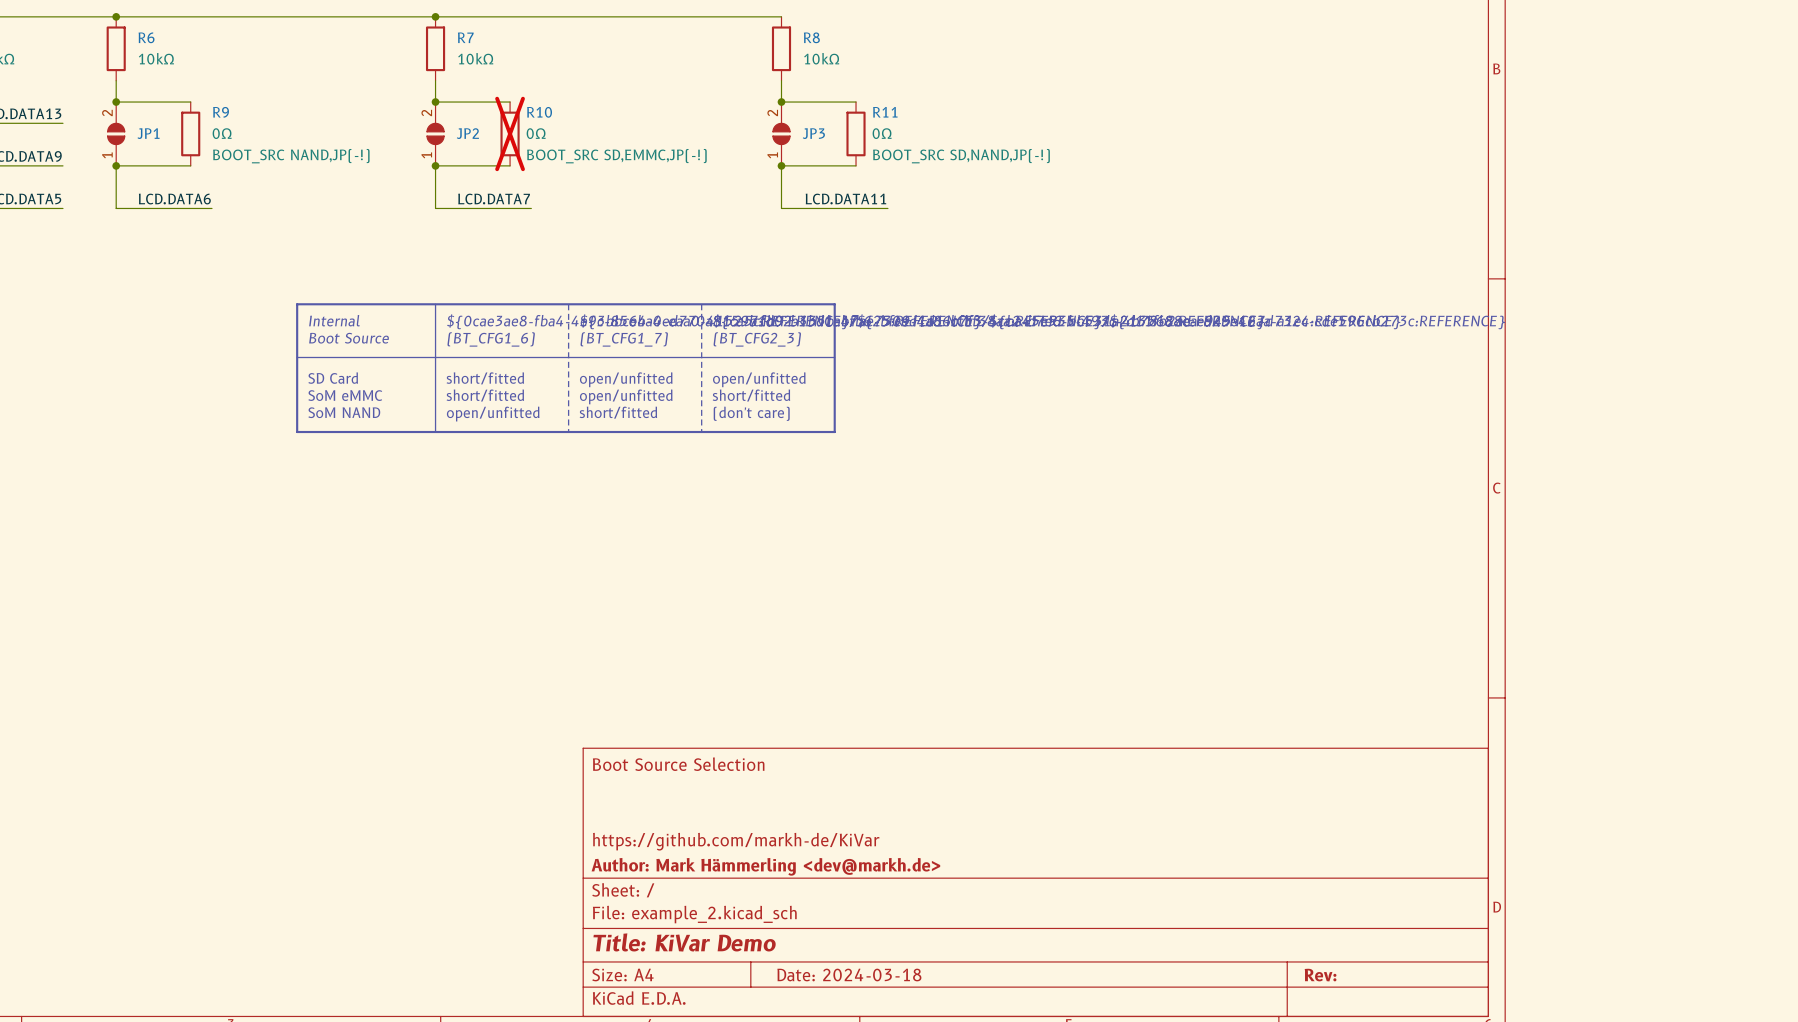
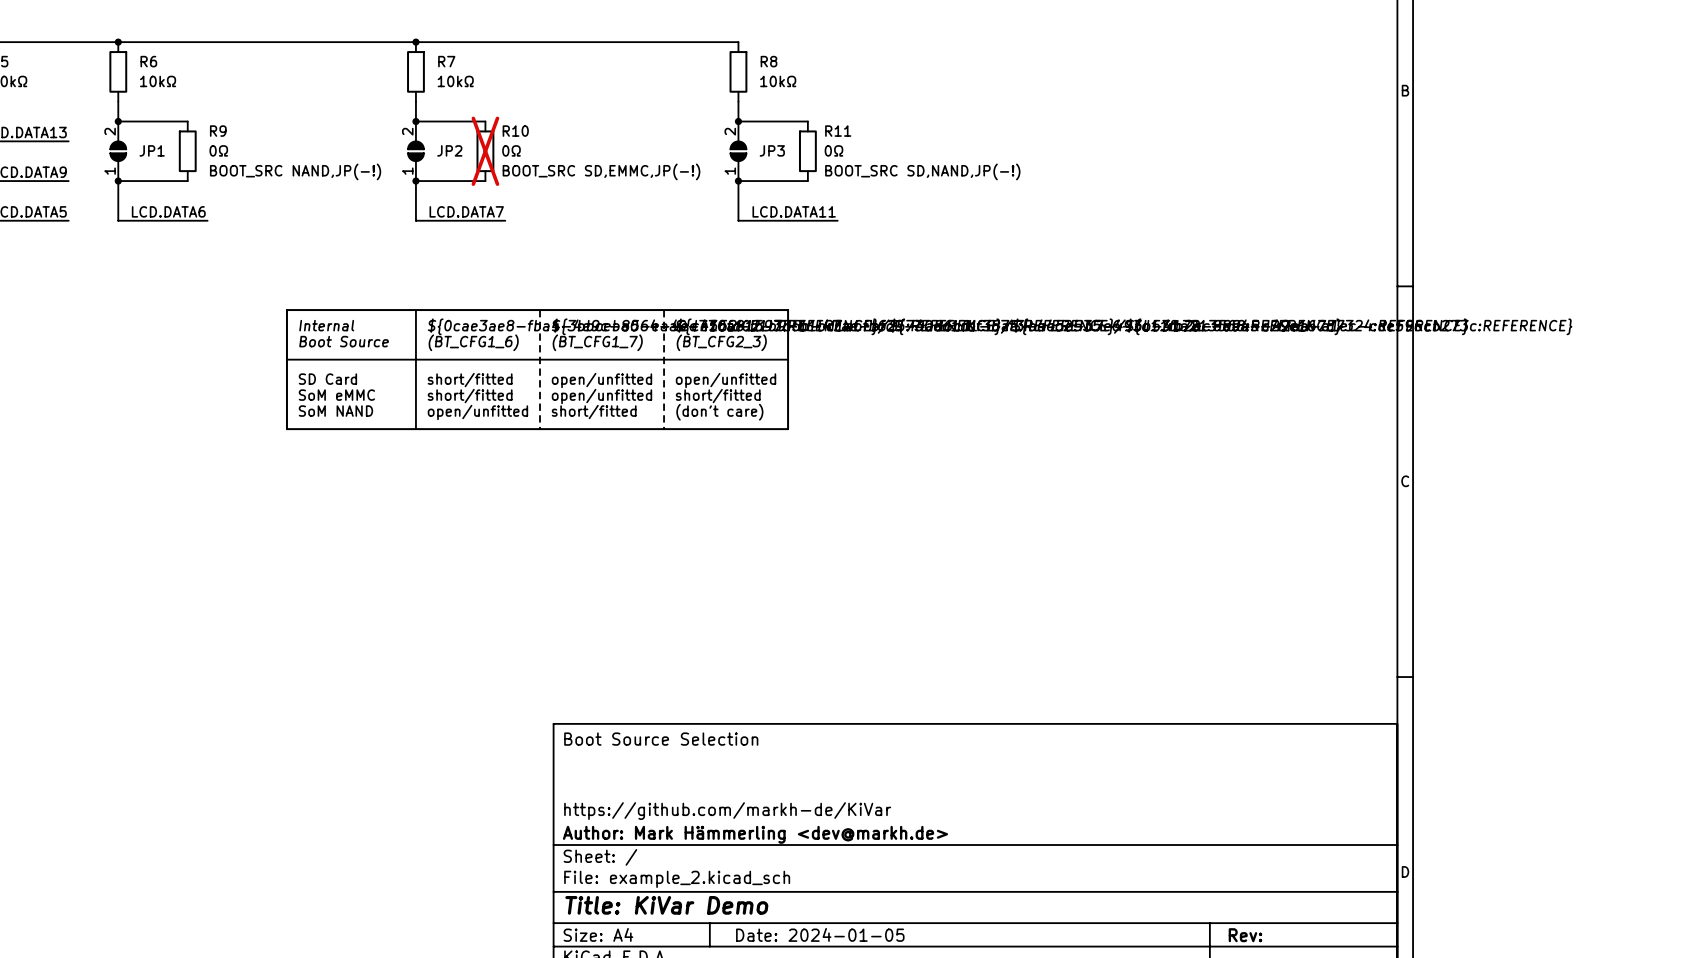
title block: Date: 2024-03-18 (849, 974) -> Date: 2024-01-05 (820, 934)

